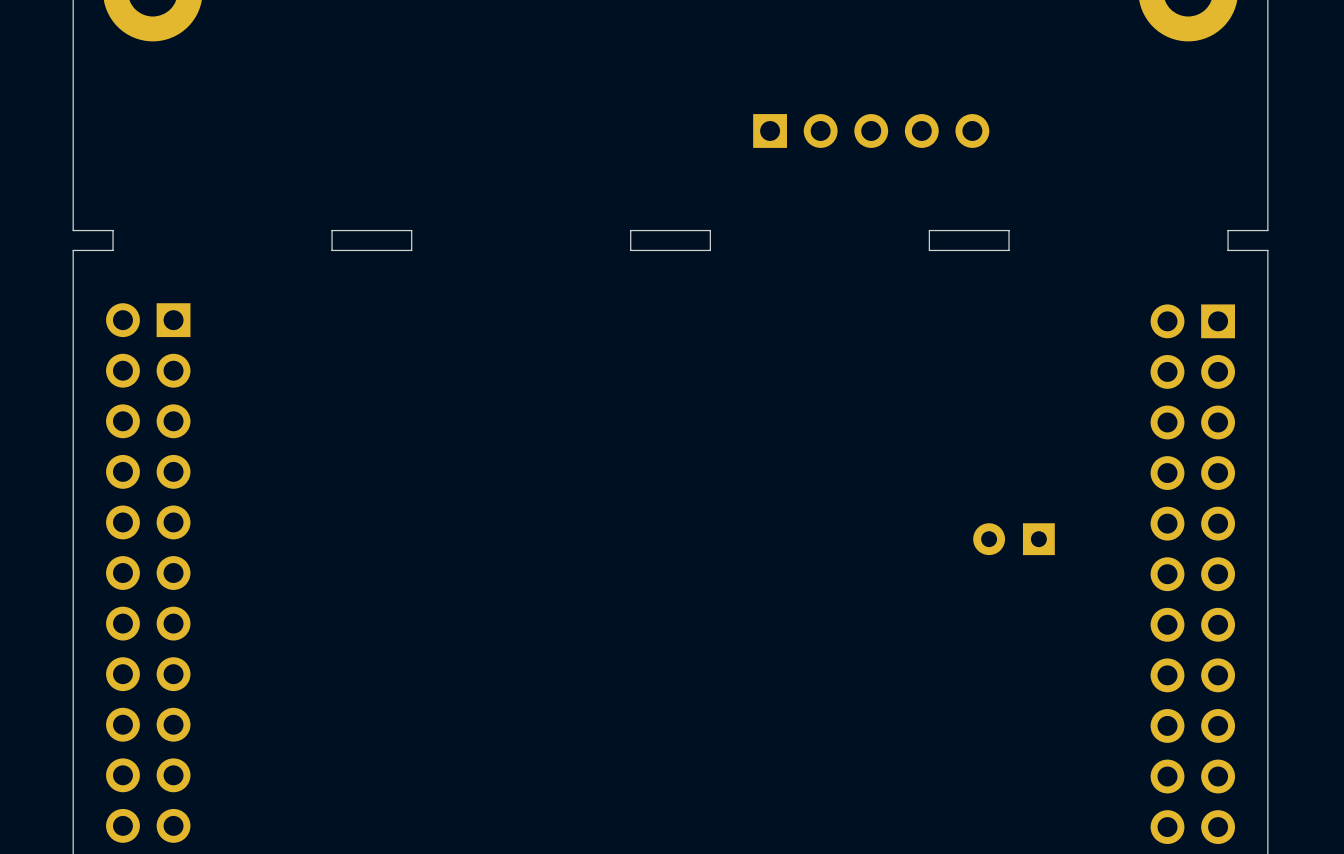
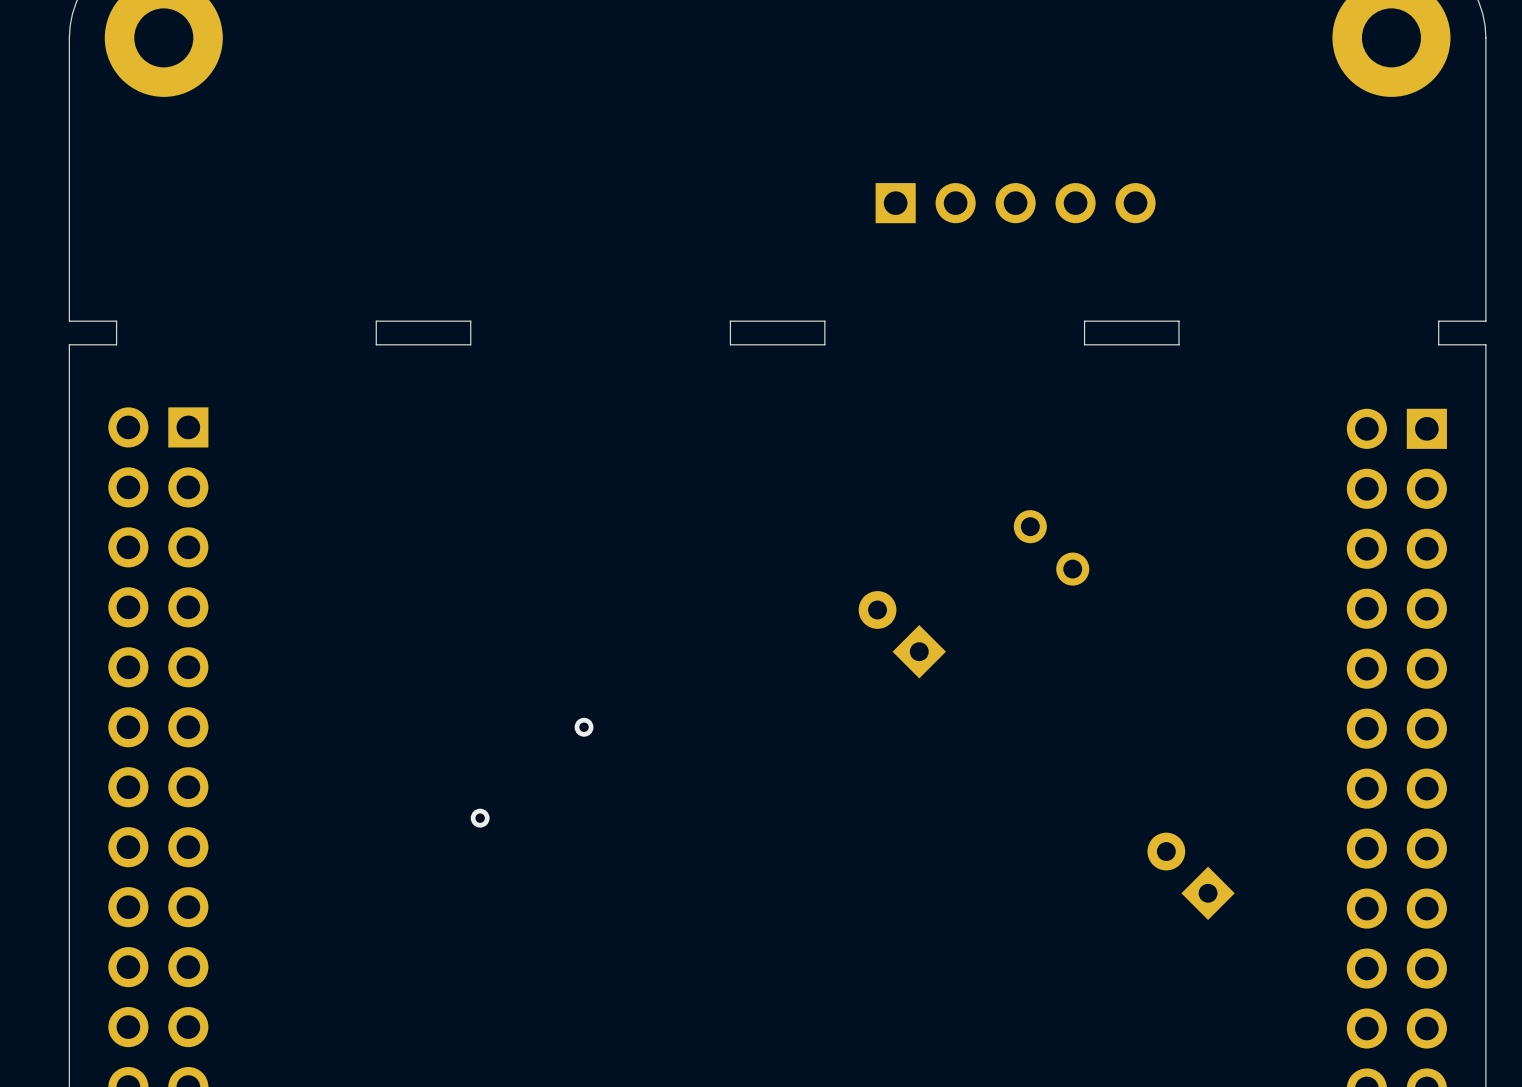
part: none -> (1051, 547)
part: none -> (902, 634)
part: (1013, 539) -> none
via: none -> (584, 727)
via: none -> (480, 818)
part: none -> (1191, 876)

